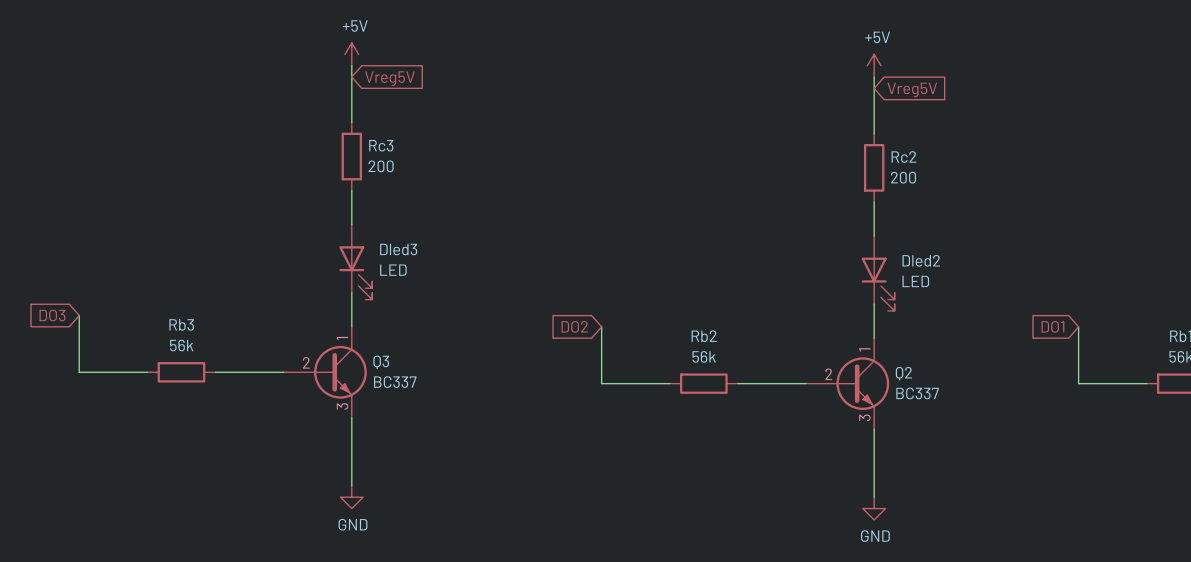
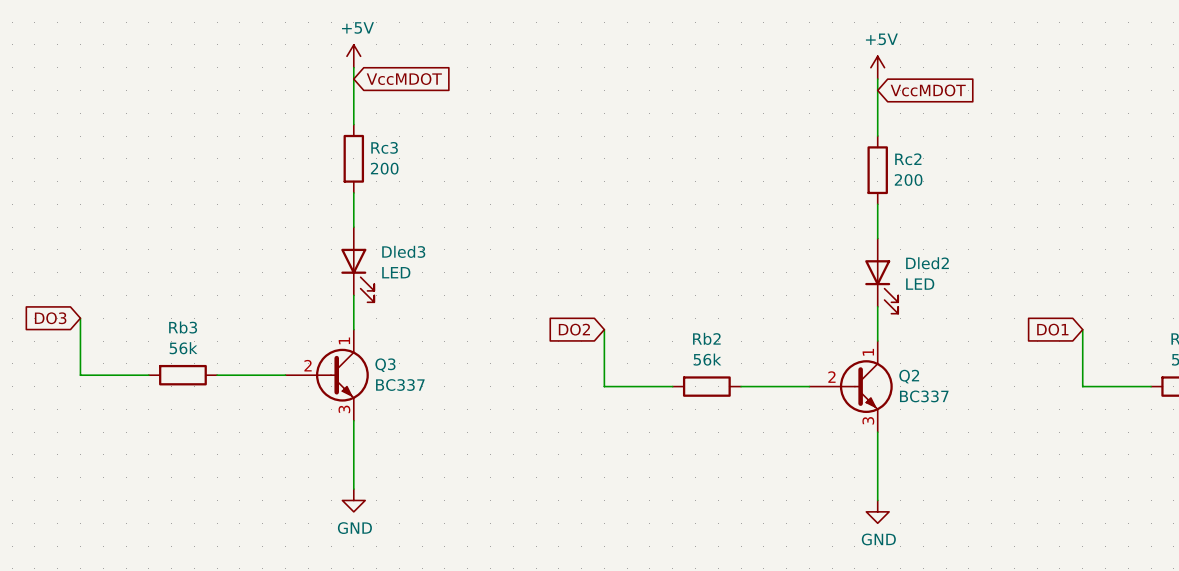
global label: Vreg5V (389, 78) -> VccMDOT (404, 79)
global label: Vreg5V (912, 90) -> VccMDOT (928, 90)

